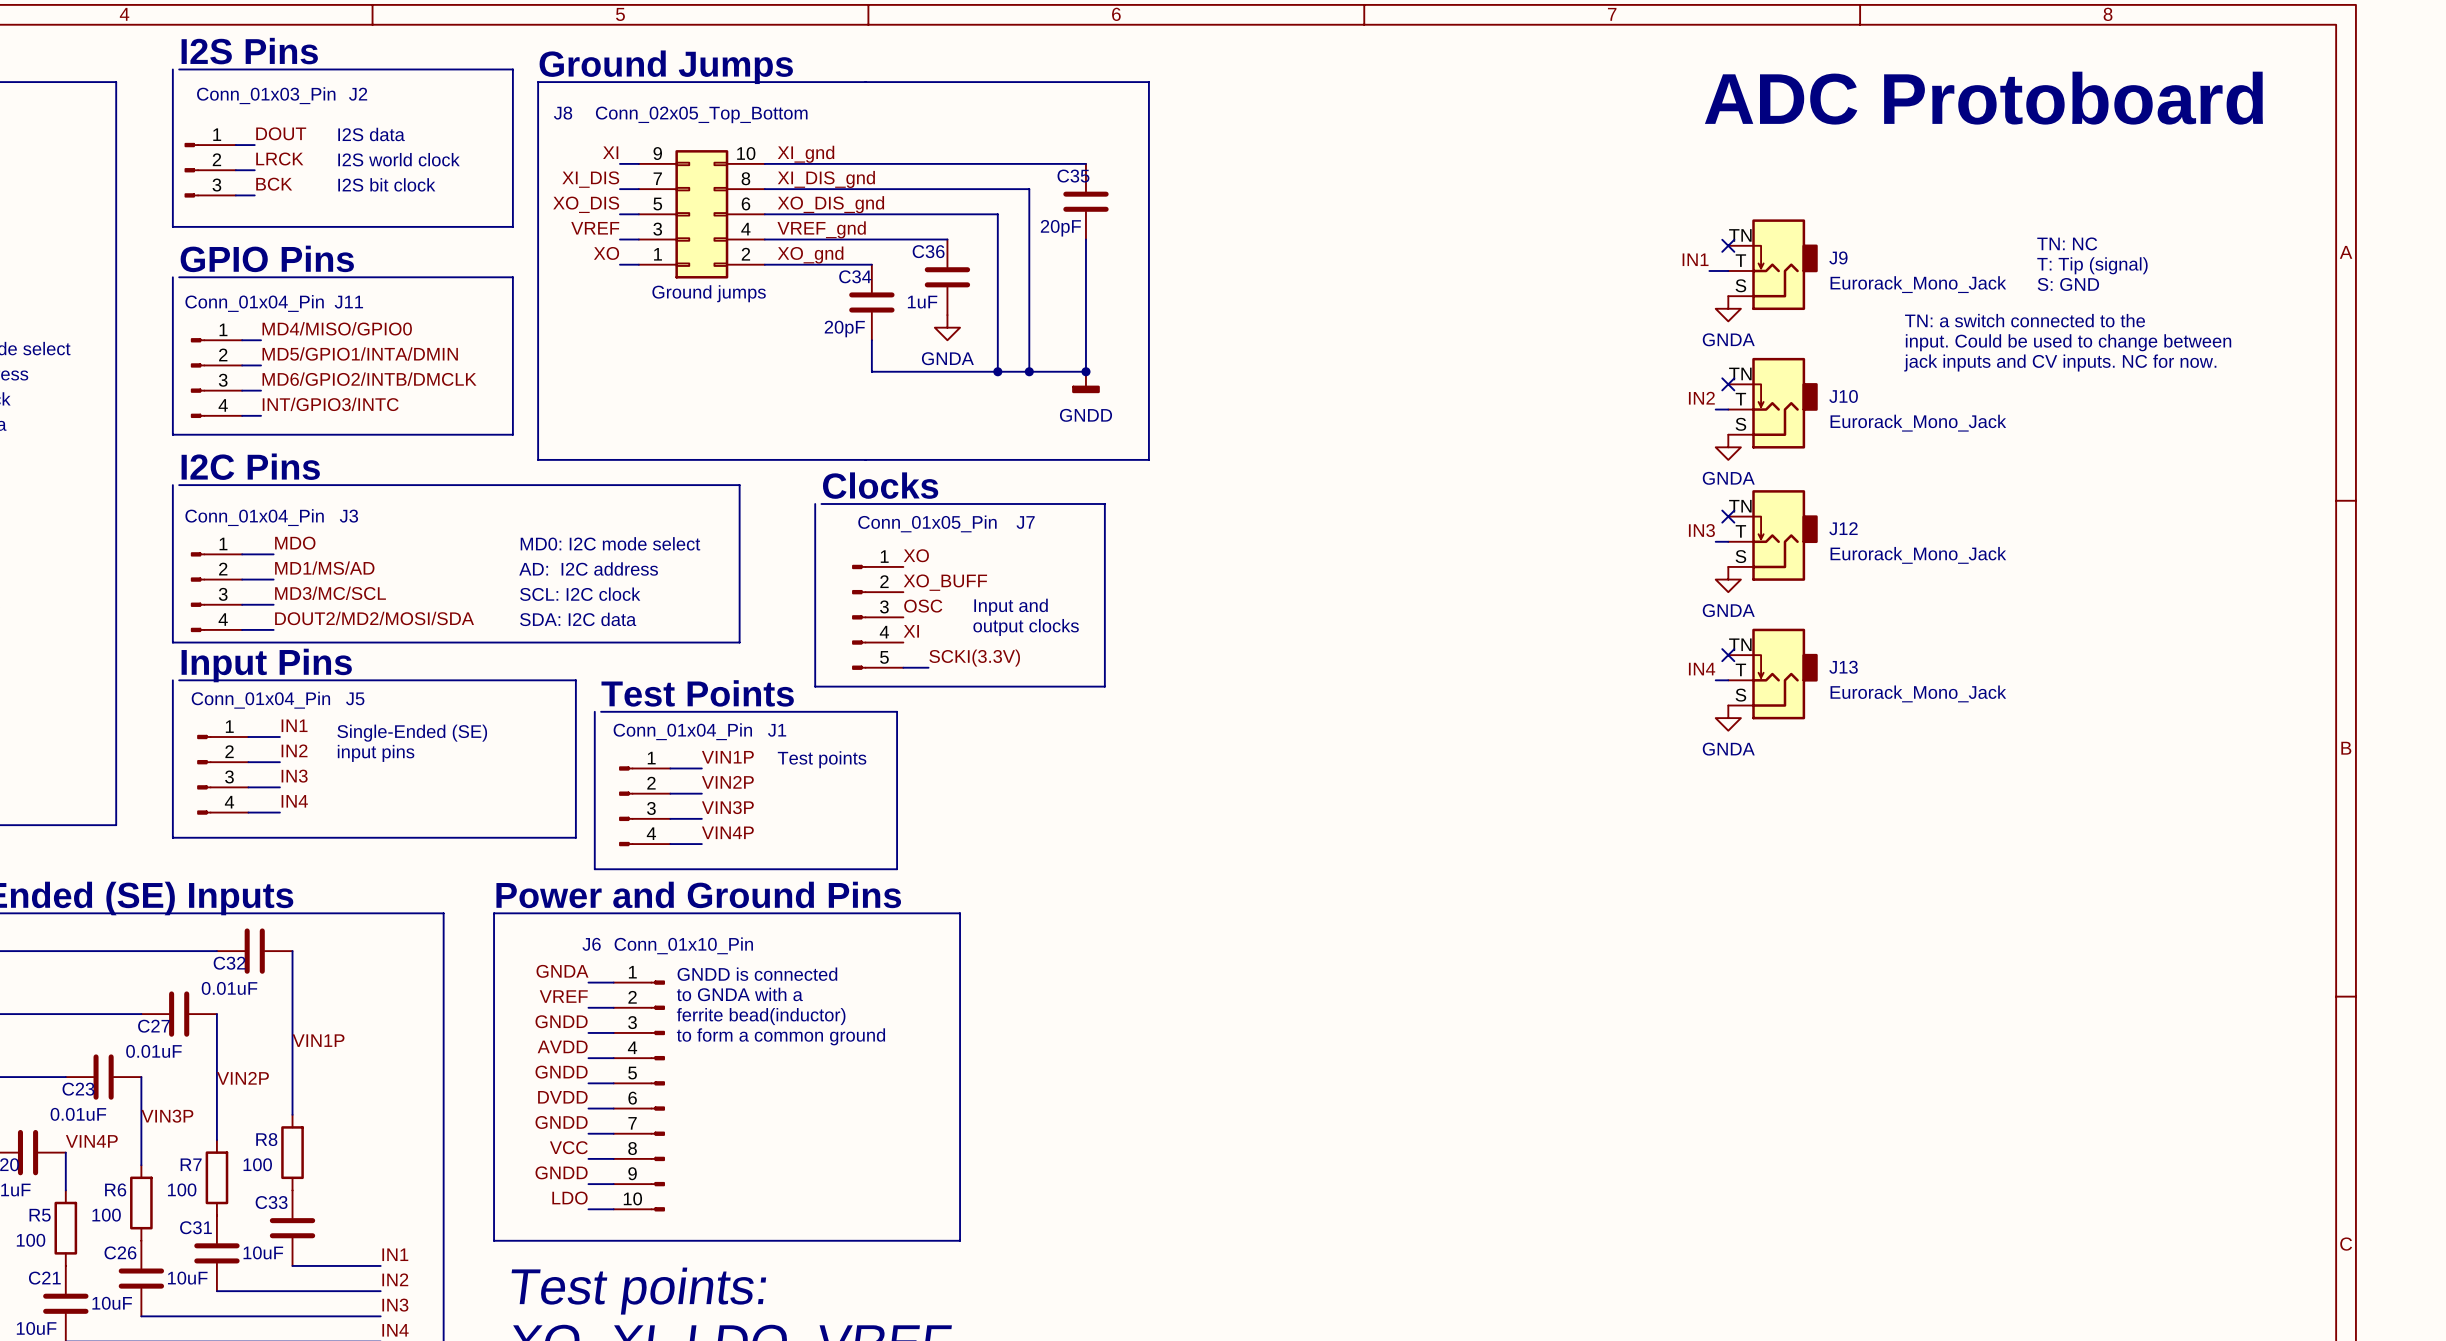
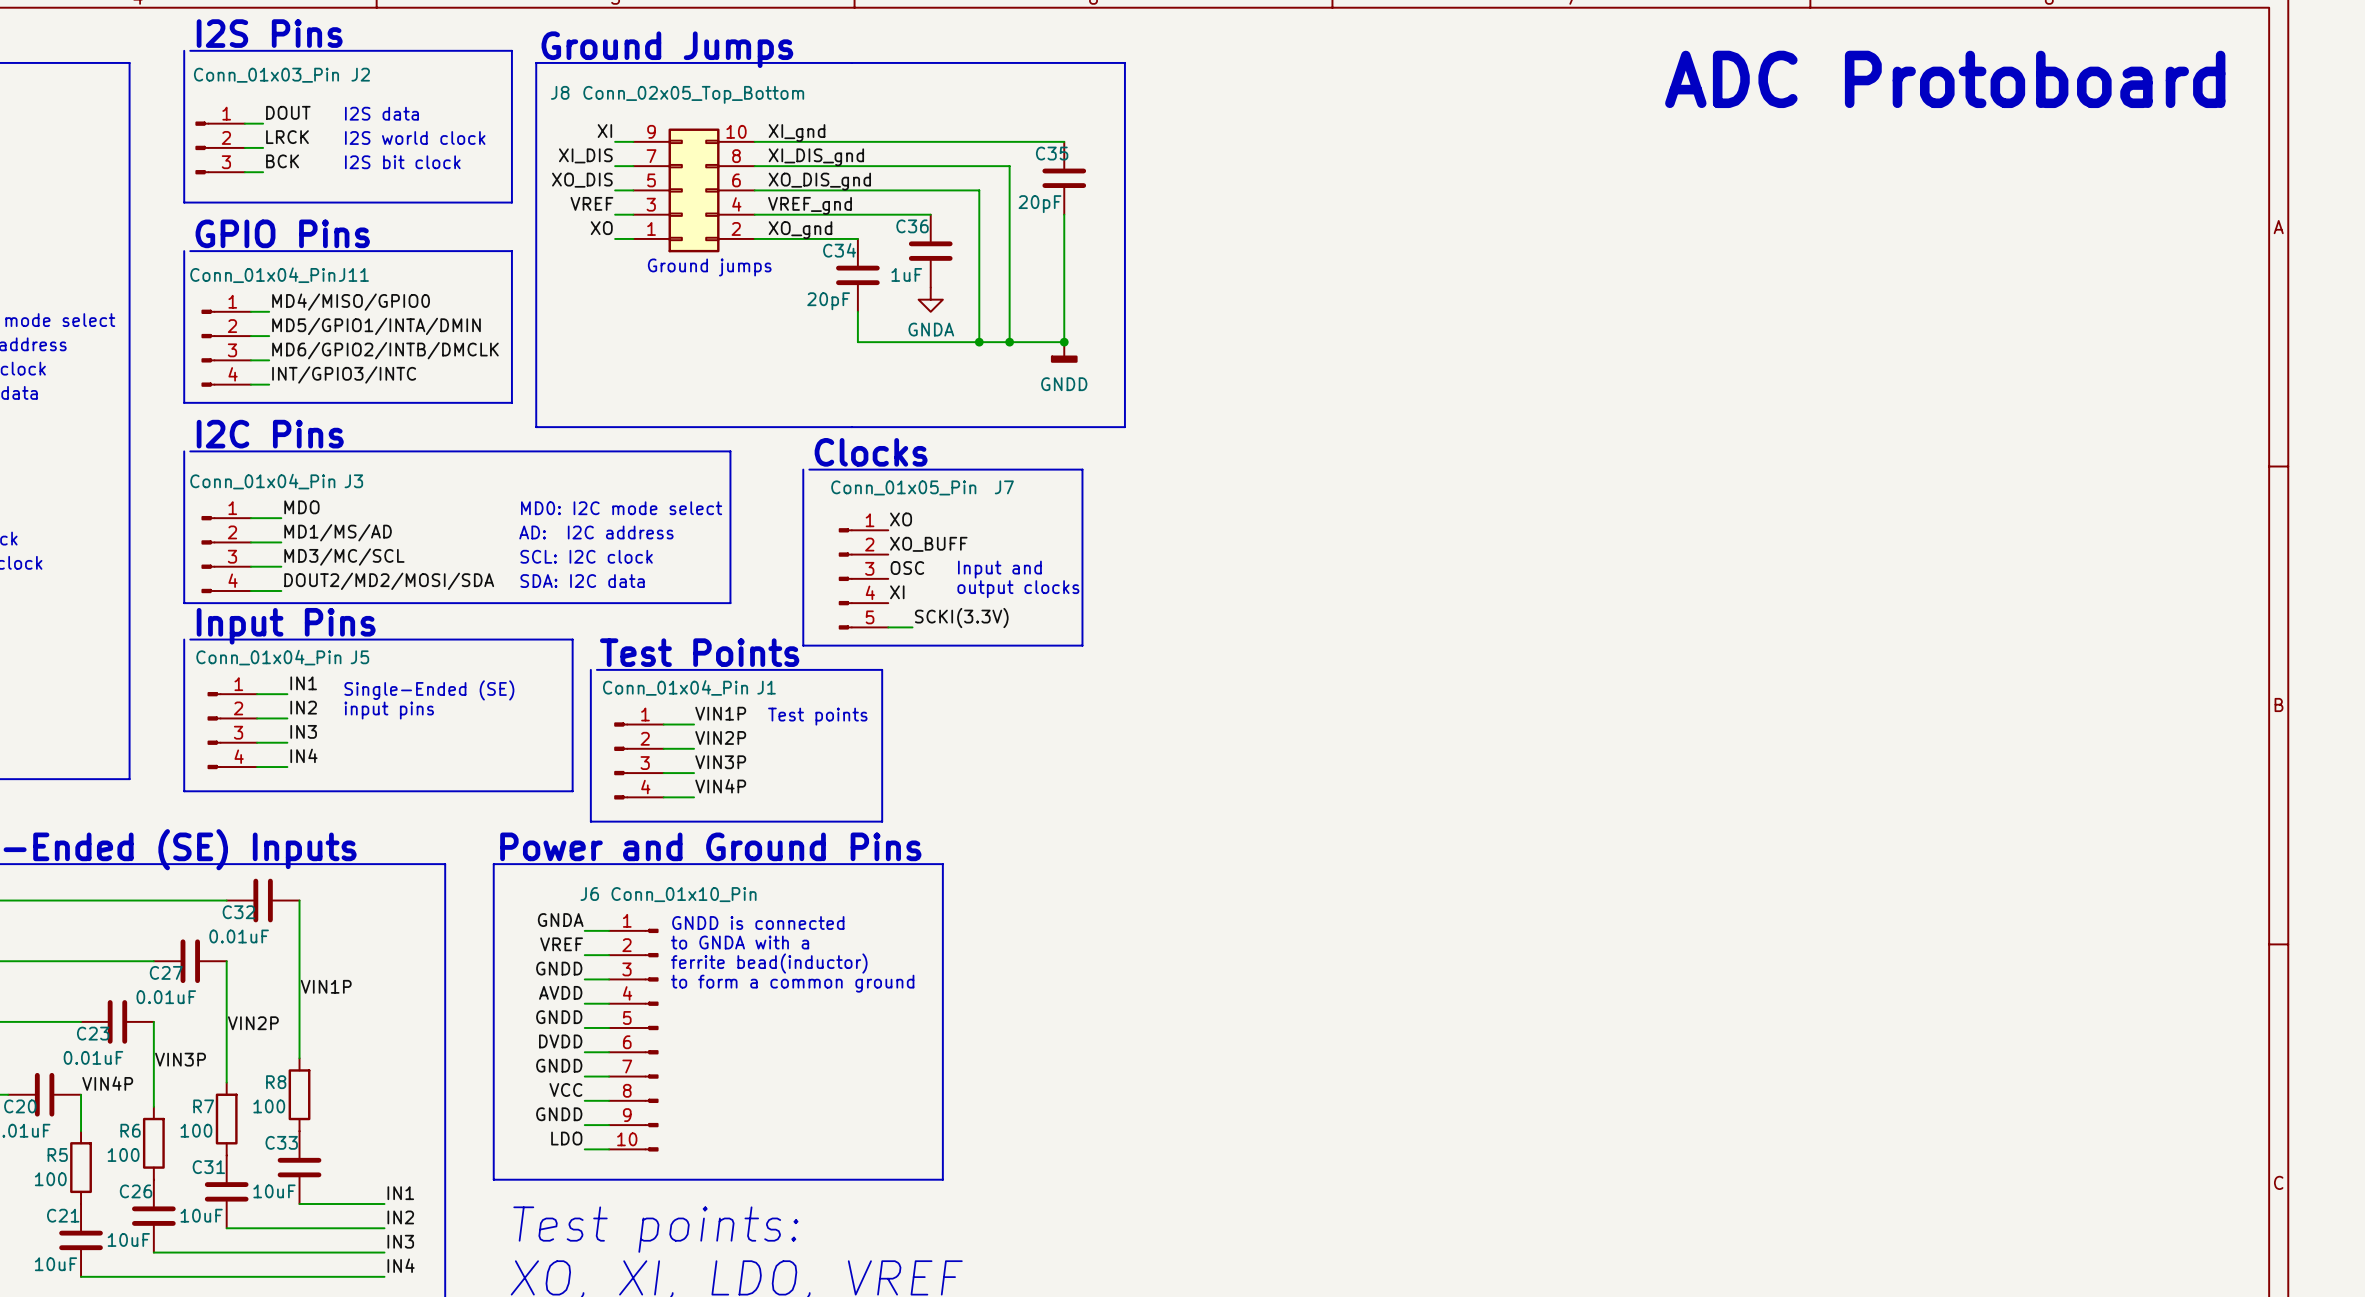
text: TN: NC (2067, 243) -> none
no-connect mark: (1728, 245) -> none
label: IN1 (1695, 259) -> none
J9: Eurorack_Mono_Jack (1773, 264) -> none
text: T: Tip (signal) (2092, 265) -> none
wire: (1709, 270) (1728, 270) -> none
text: S: GND (2068, 284) -> none
power symbol: GNDA (1728, 308) -> none
text: TN: a switch connected to the (2025, 320) -> none
text: input. Could be used to change between (2068, 342) -> none
text: jack inputs and CV inputs. NC for now. (2060, 363) -> none
no-connect mark: (1728, 384) -> none
label: IN2 (1701, 398) -> none
J10: Eurorack_Mono_Jack (1773, 403) -> none
wire: (1715, 409) (1728, 409) -> none
power symbol: GNDA (1728, 447) -> none
no-connect mark: (1728, 516) -> none
label: IN3 (1701, 530) -> none
J12: Eurorack_Mono_Jack (1773, 535) -> none
wire: (1715, 541) (1728, 541) -> none
power symbol: GNDA (1728, 579) -> none
no-connect mark: (1728, 655) -> none
label: IN4 (1702, 669) -> none
J13: Eurorack_Mono_Jack (1773, 674) -> none
wire: (1715, 680) (1728, 680) -> none
power symbol: GNDA (1728, 718) -> none

